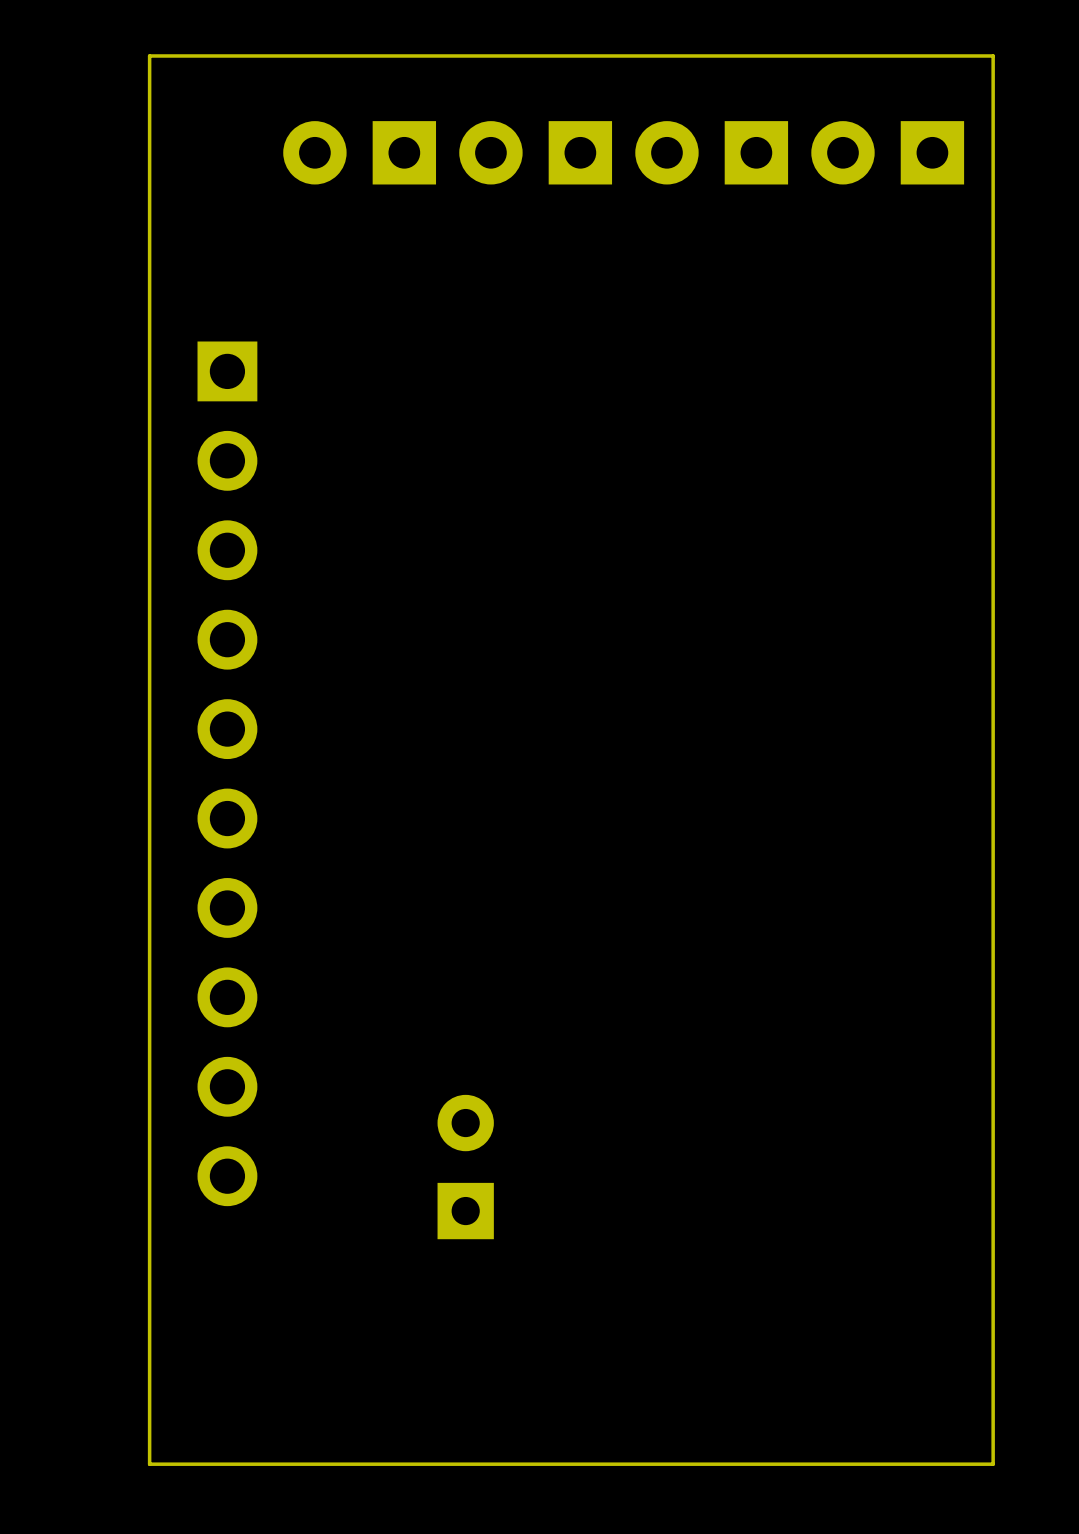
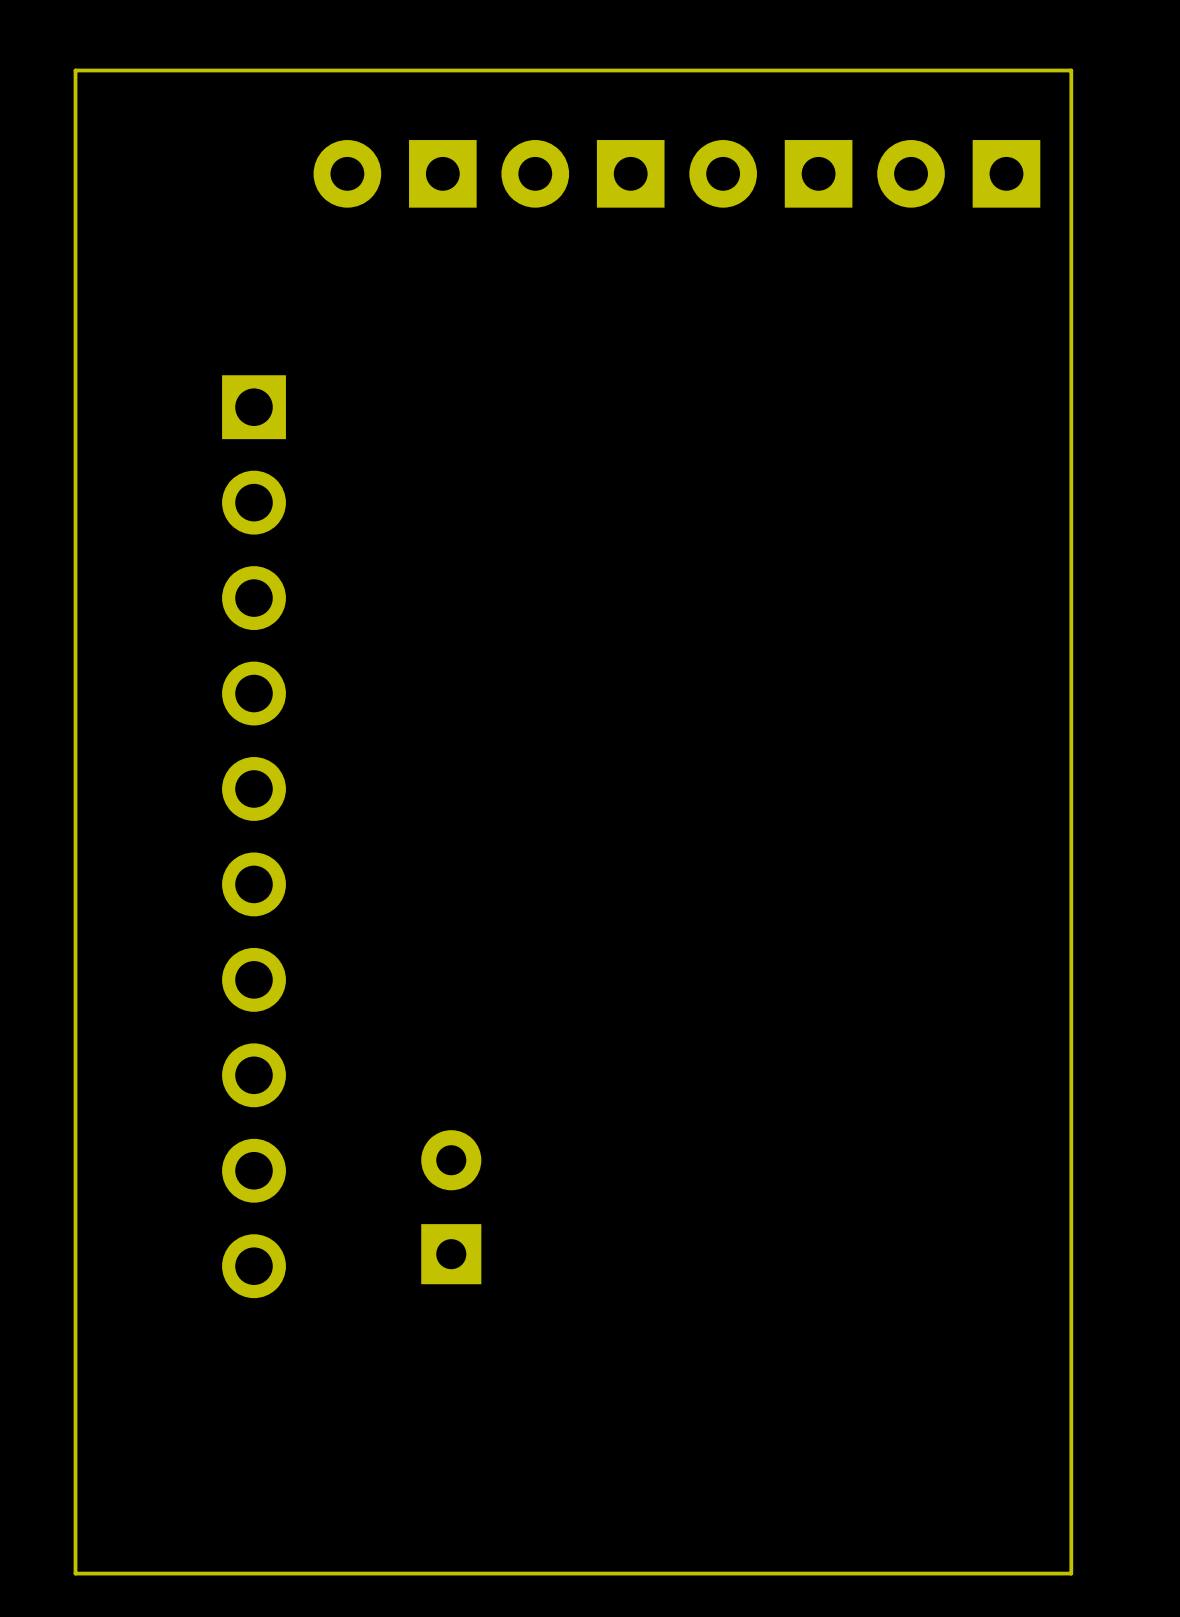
board edge: (149, 55) (149, 1464) -> (170, 70) (75, 70) (75, 1573) (170, 1573)
part position: (465, 1167) -> (451, 1207)

